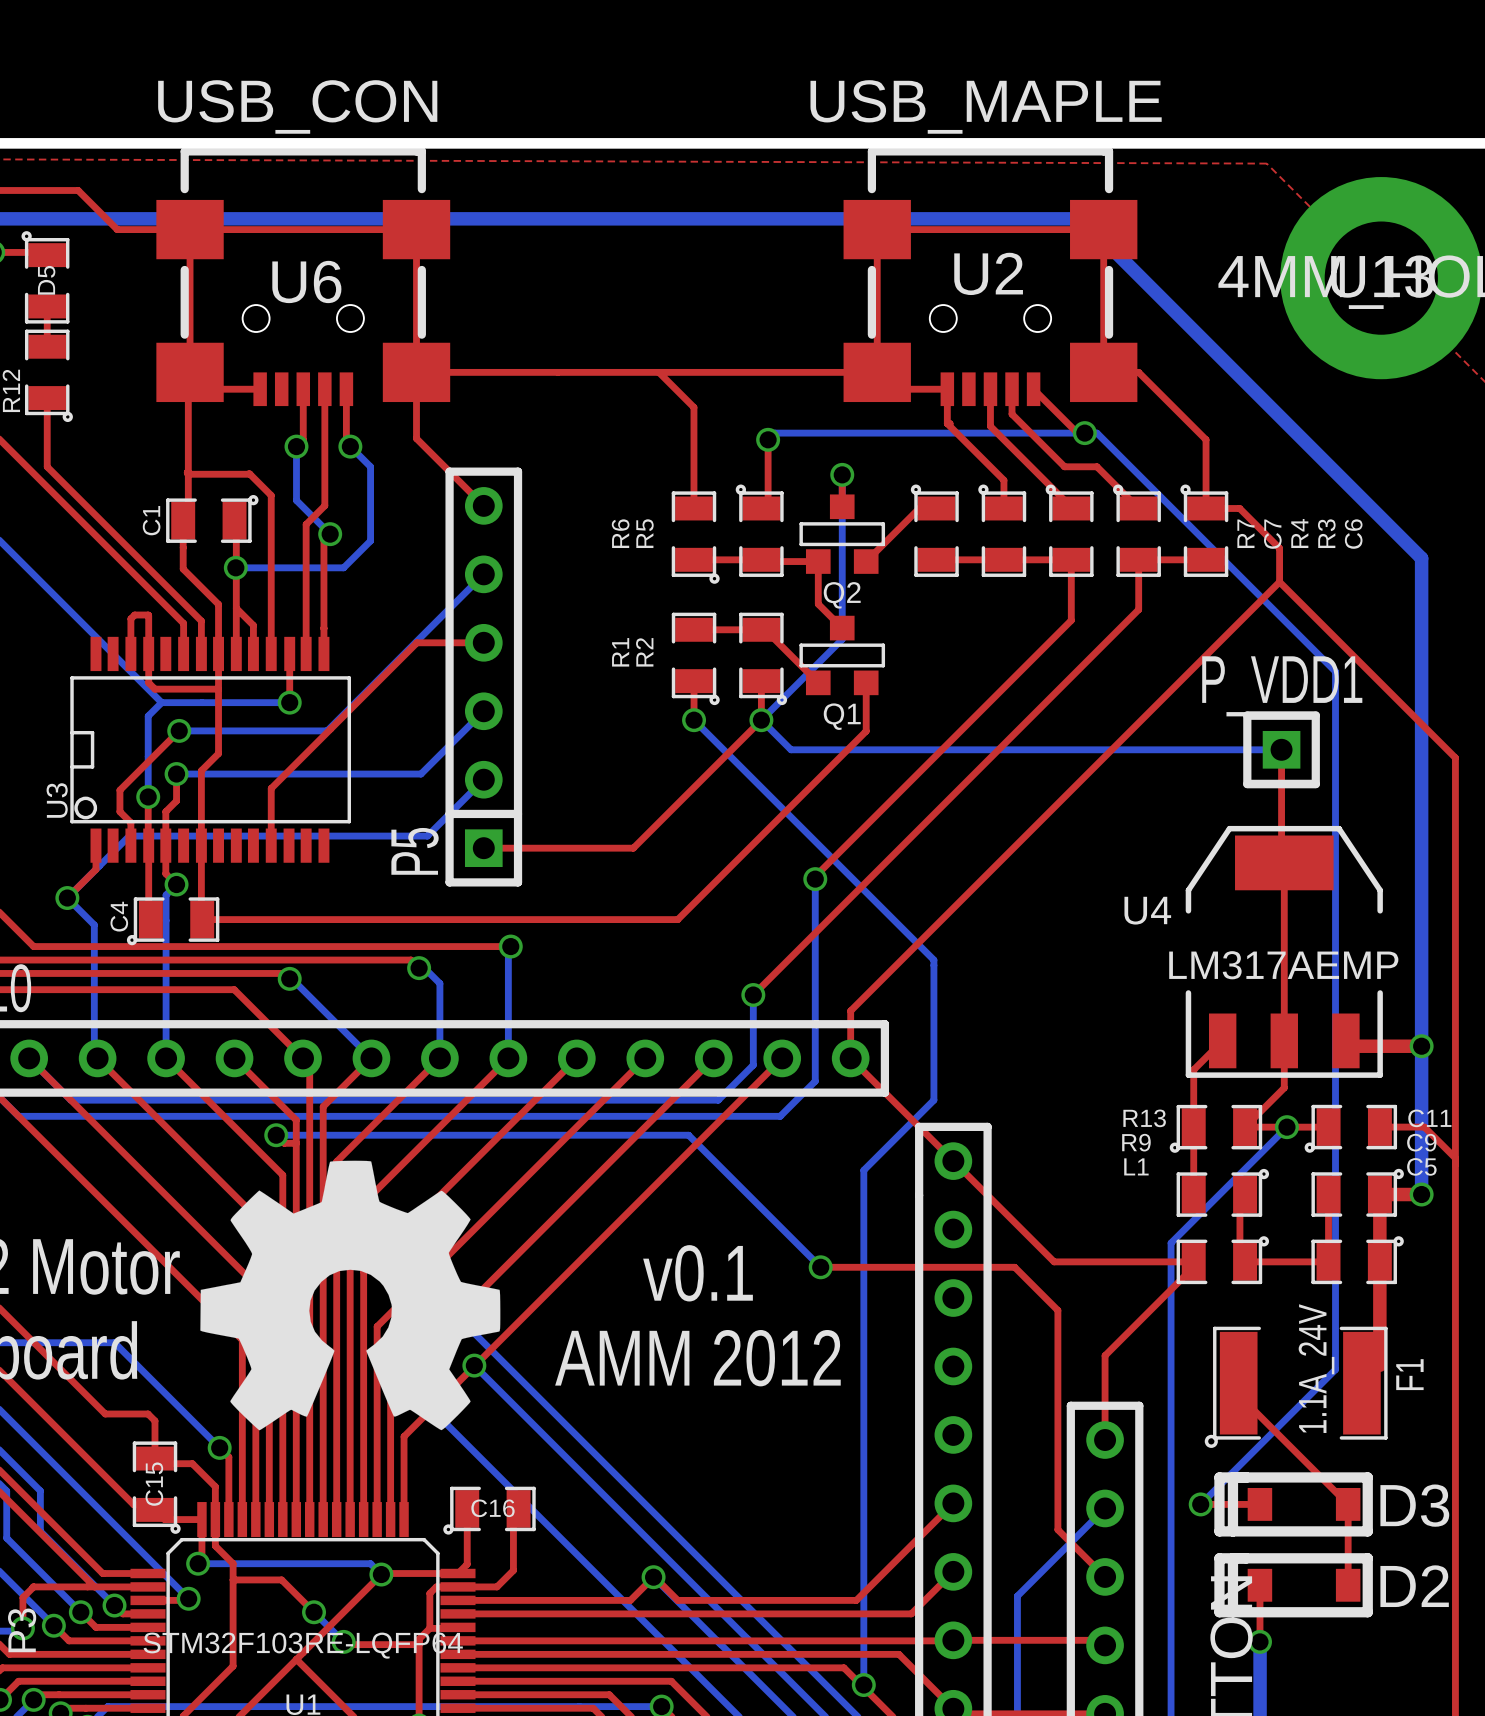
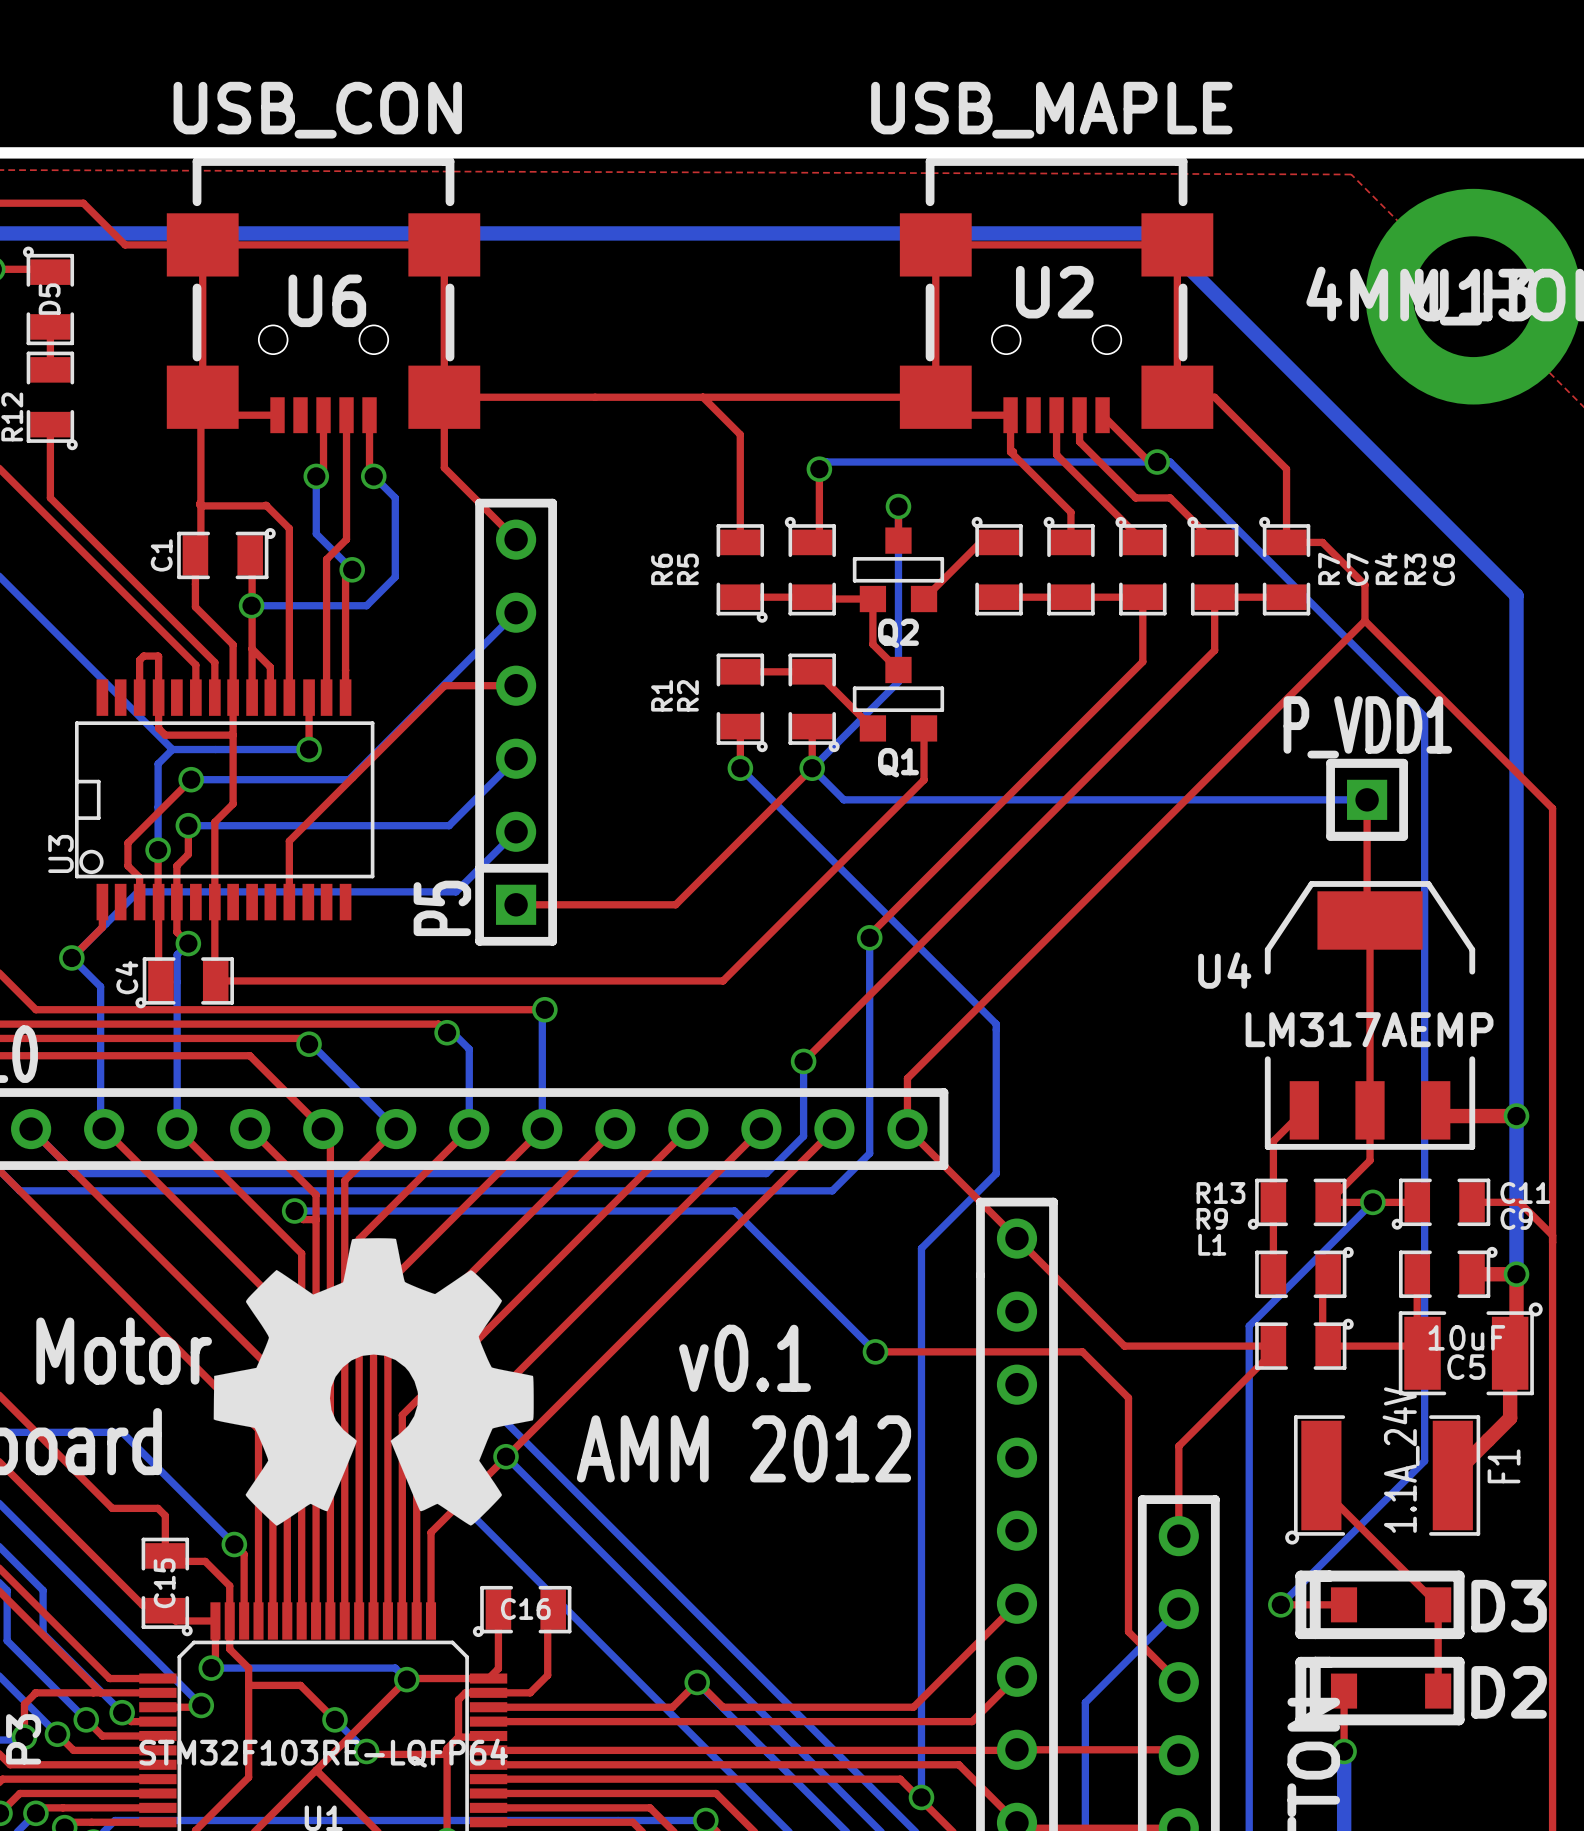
C5 name position: C5 (1421, 1166) -> C5 (1466, 1367)
top track: (1379, 1194) (1379, 1365) -> none
top track: none -> (1516, 1274) (1516, 1346) (1510, 1353) (1510, 1418) (1452, 1475)
C5 footprint: [1311, 1236, 1404, 1285] -> [1398, 1302, 1543, 1396]
C5 value: none -> 10uF (1466, 1337)

